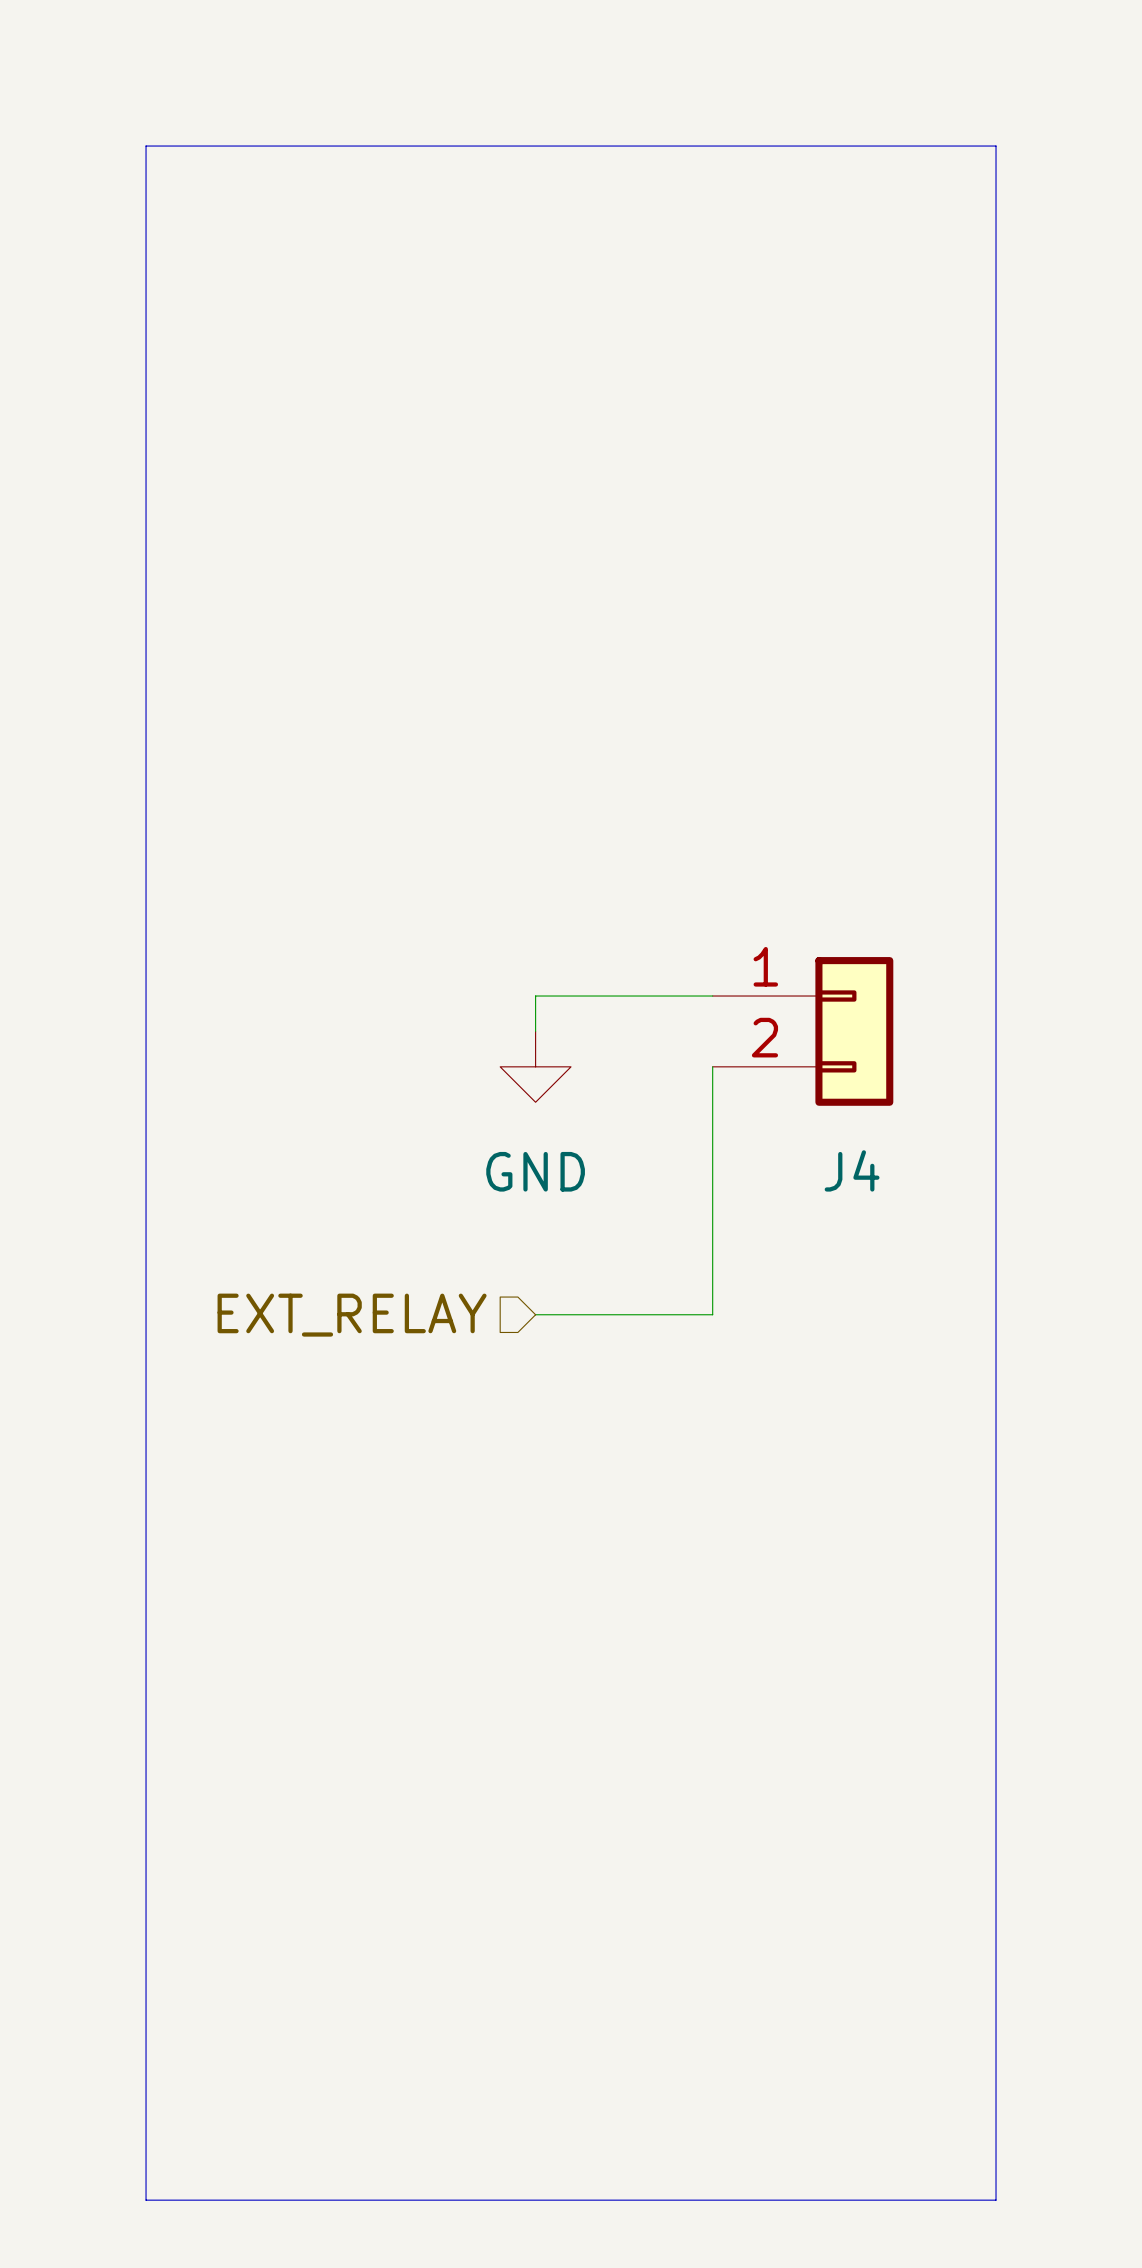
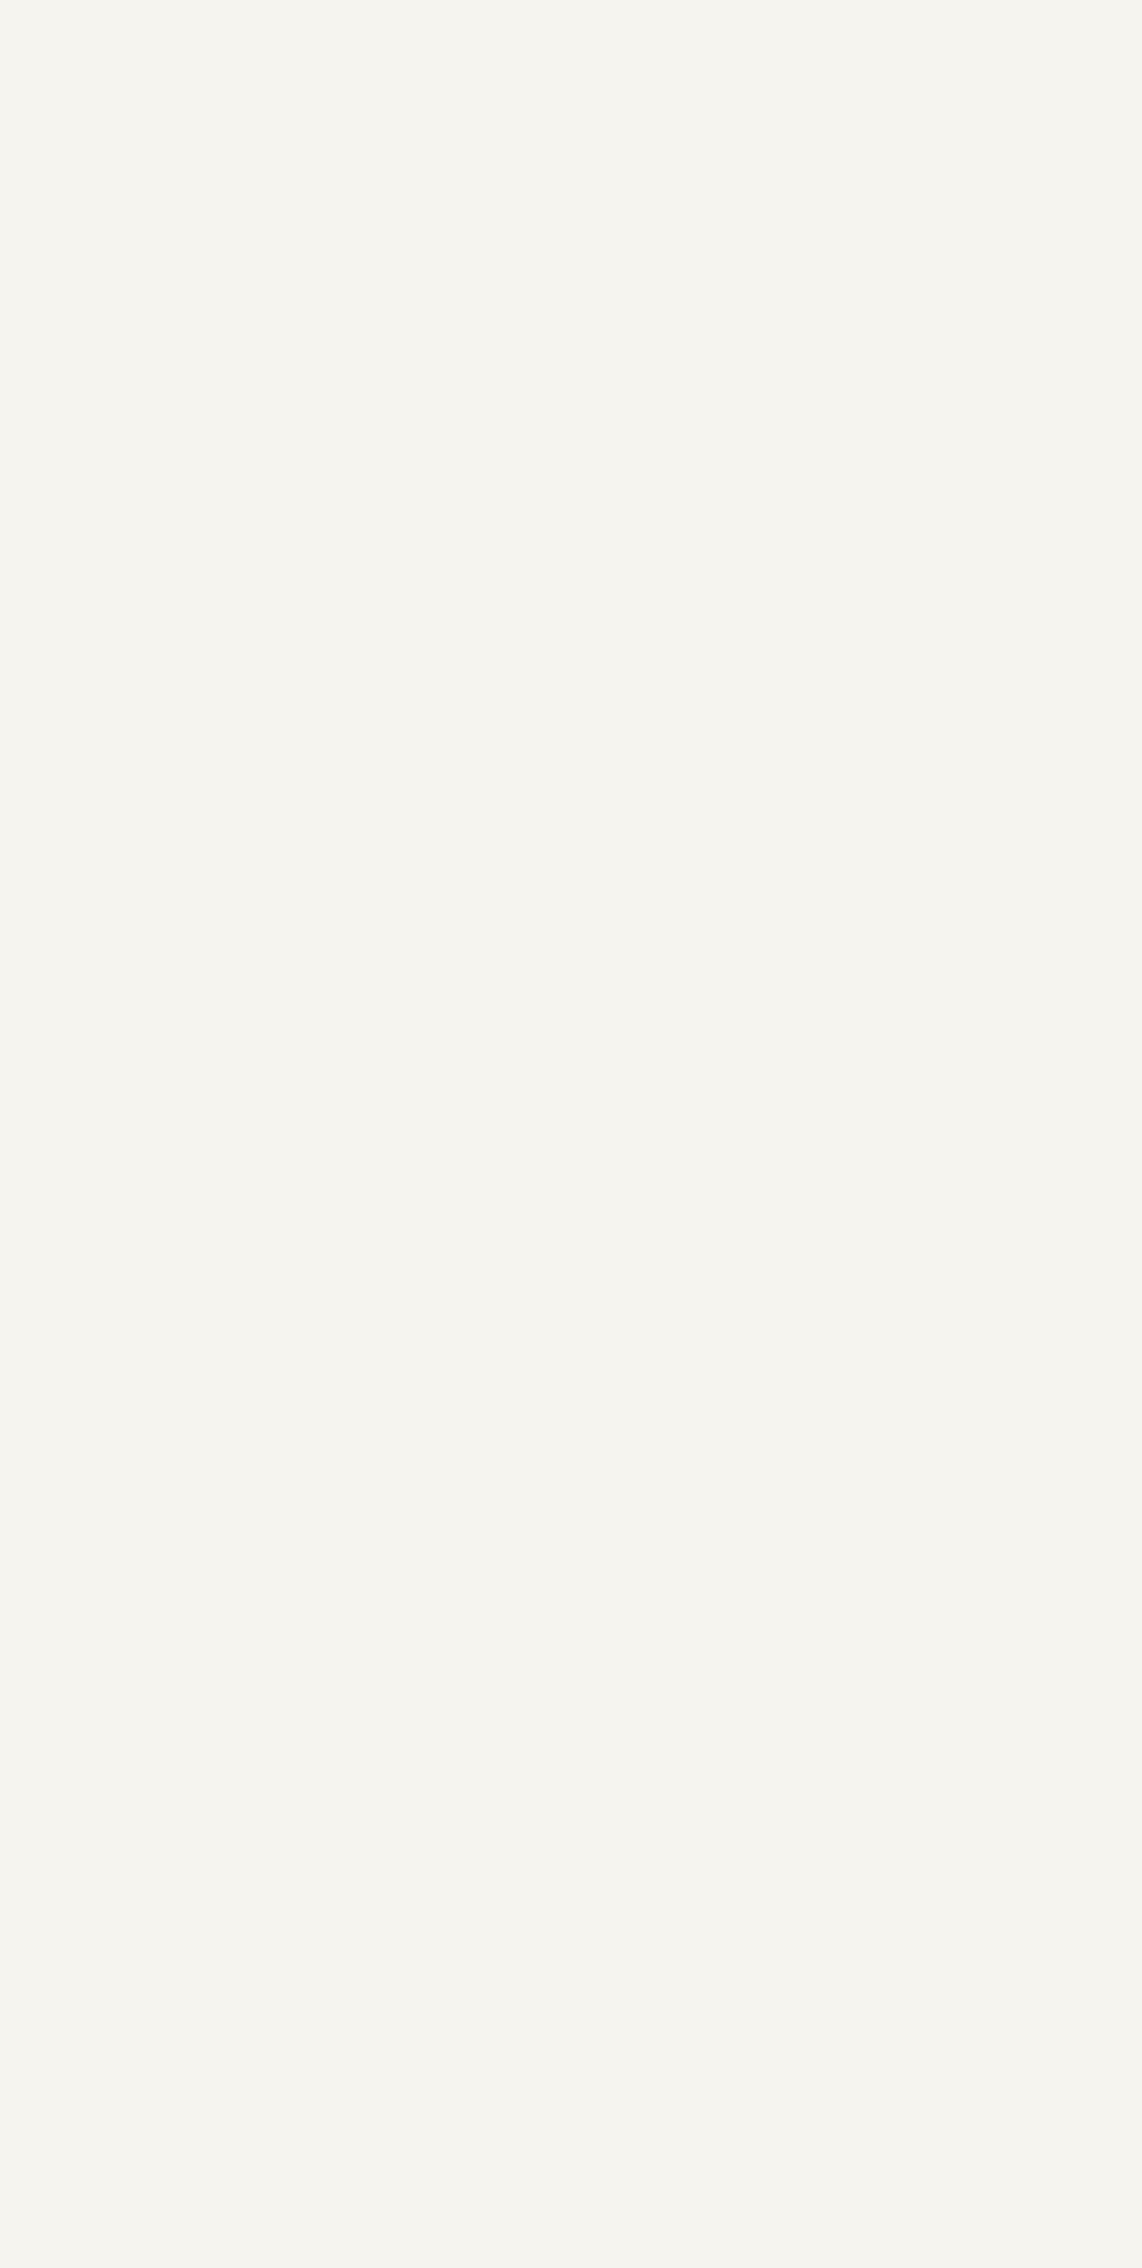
line: (146, 146) (996, 146) (996, 2200) (146, 2200) (146, 146) -> none
wire: (712, 996) (535, 996) (535, 1031) -> none
J4: (802, 1031) -> none
power symbol: GND (535, 1066) -> none
wire: (712, 1066) (712, 1314) (535, 1314) -> none
hierarchical label: EXT_RELAY (352, 1315) -> none

